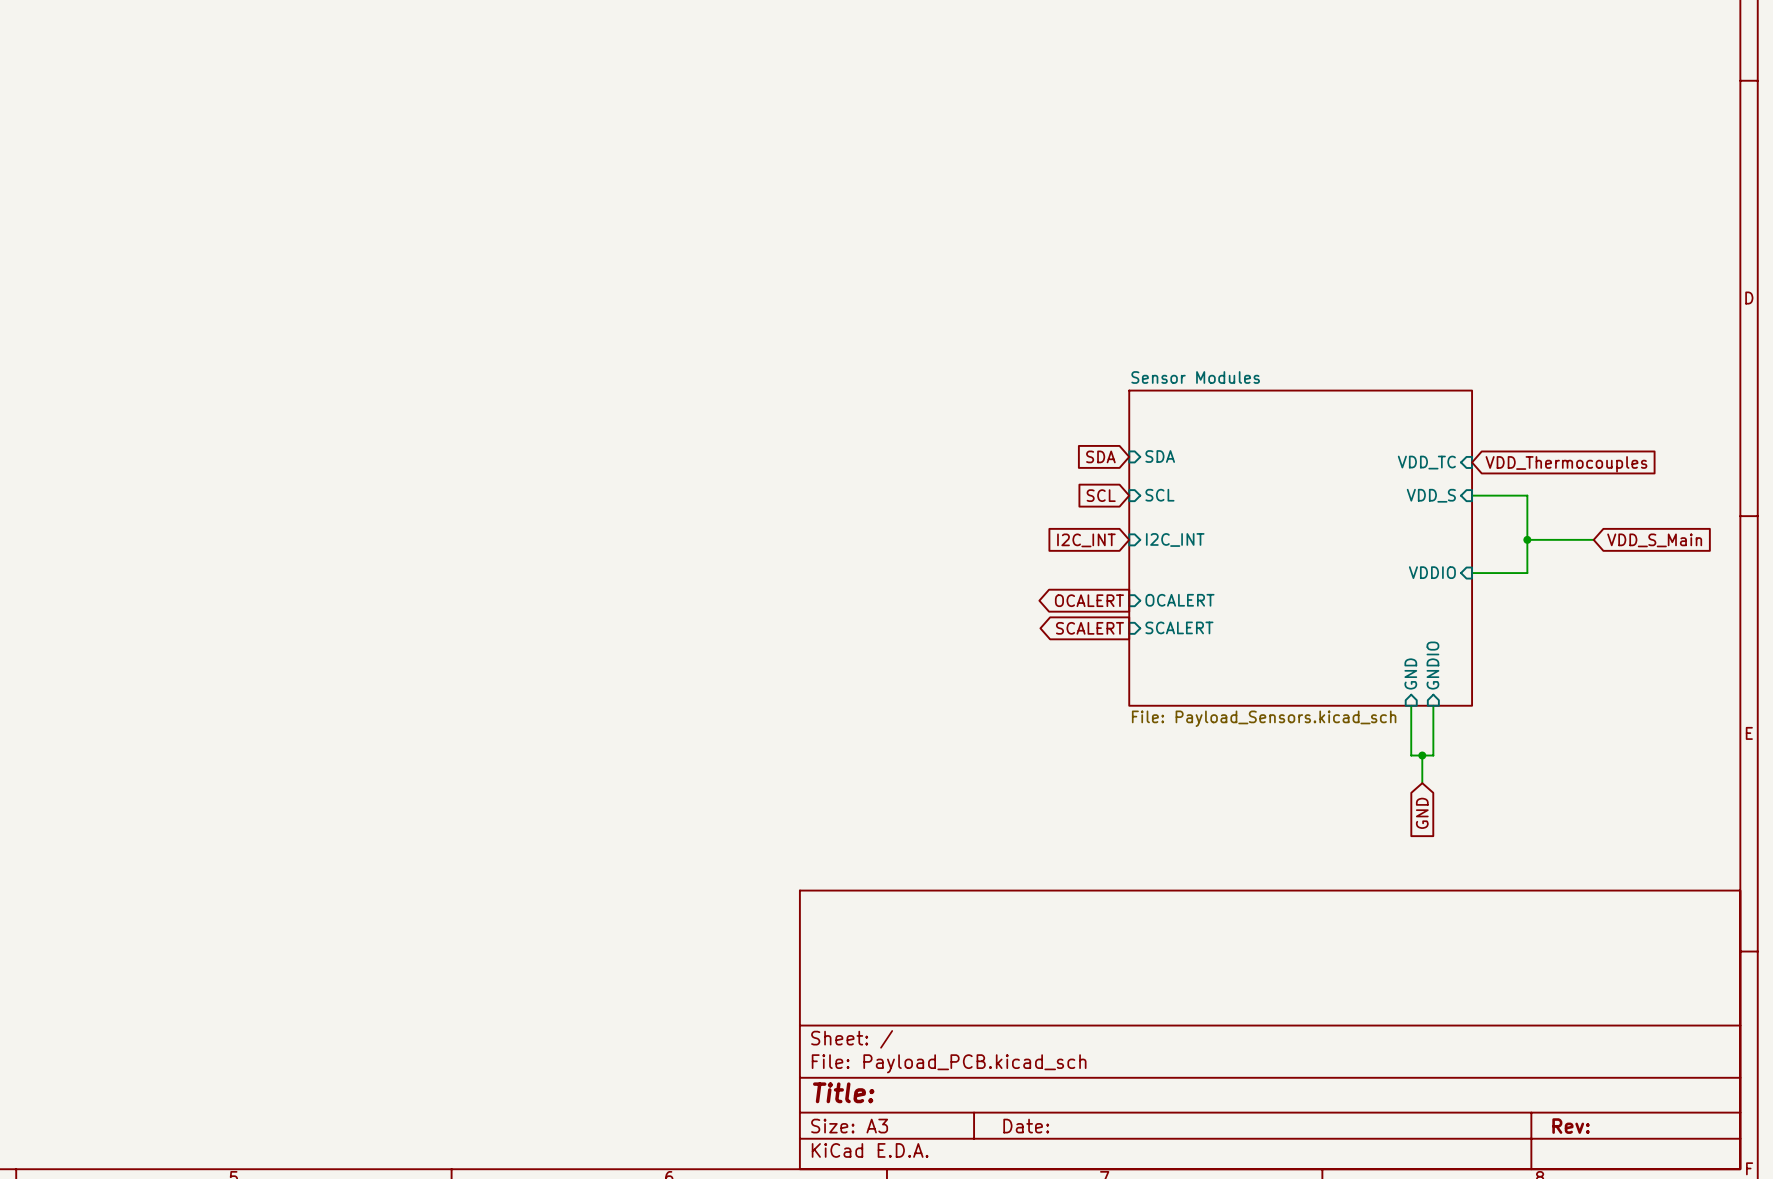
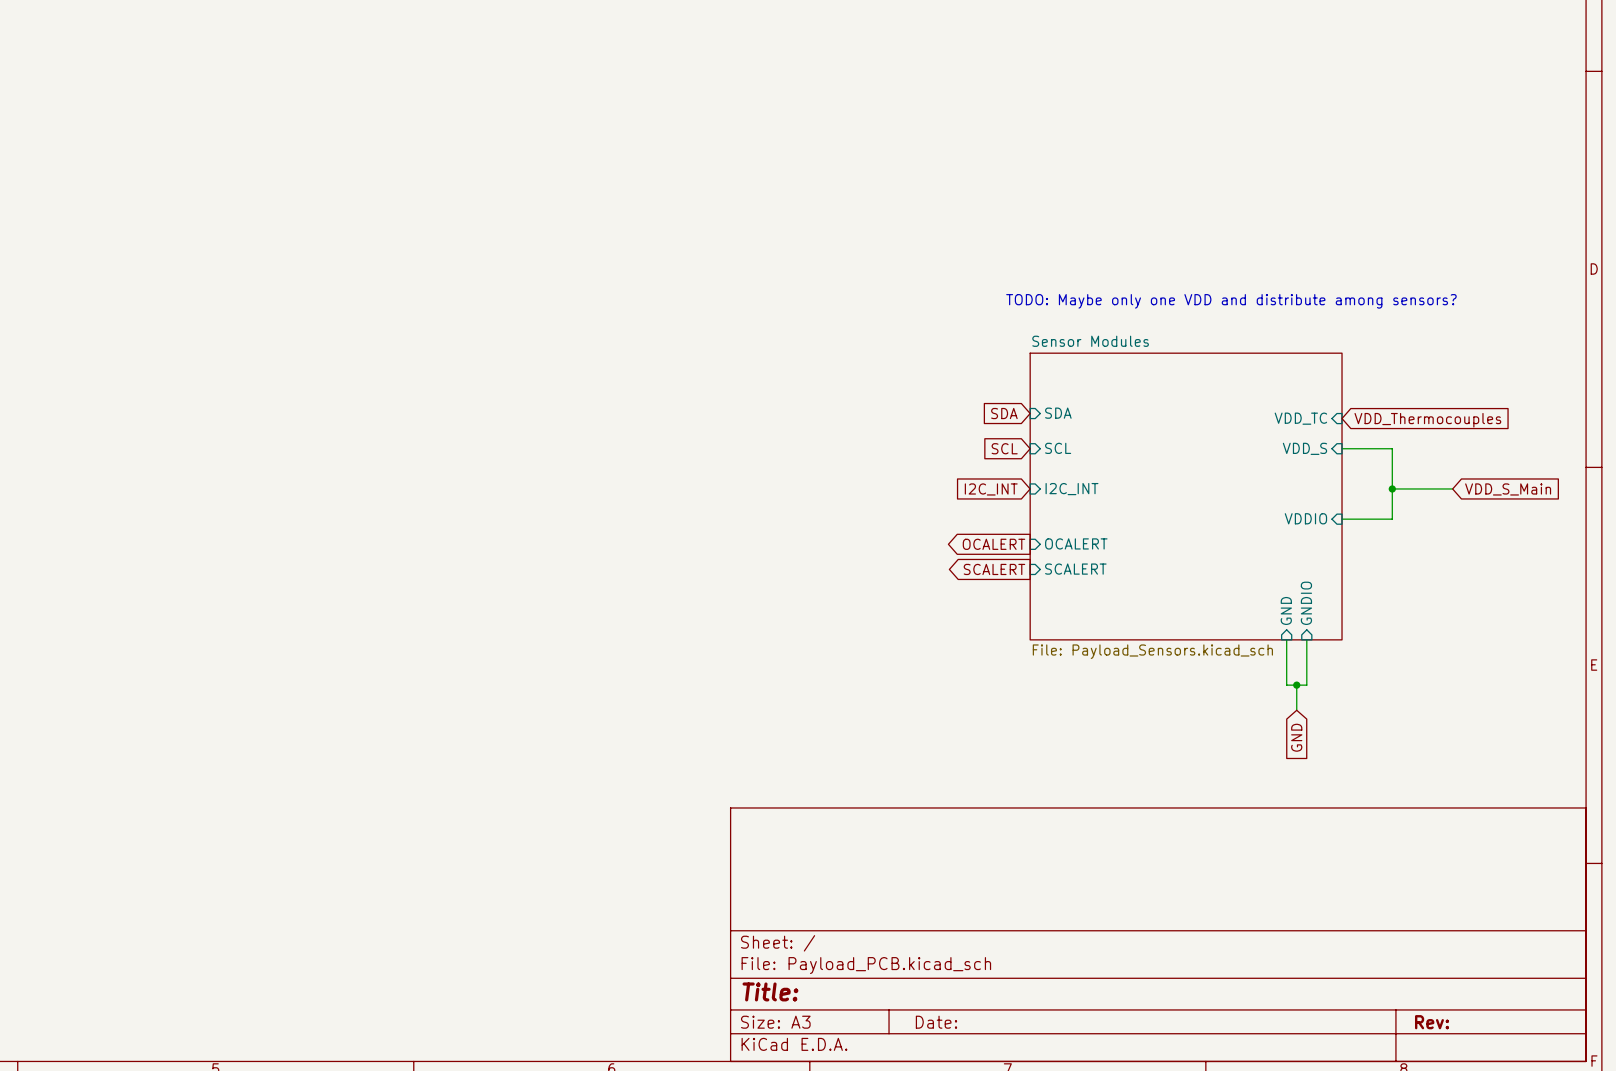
text: none -> TODO: Maybe only one VDD and distribute among sensors? (1231, 301)

